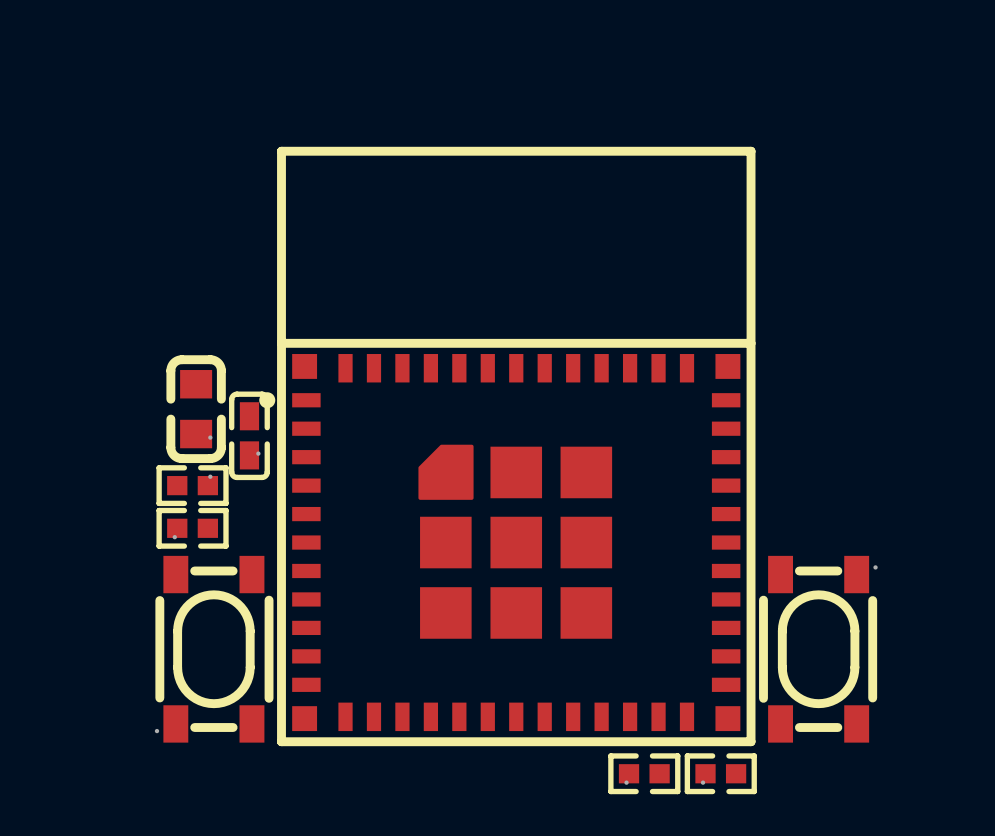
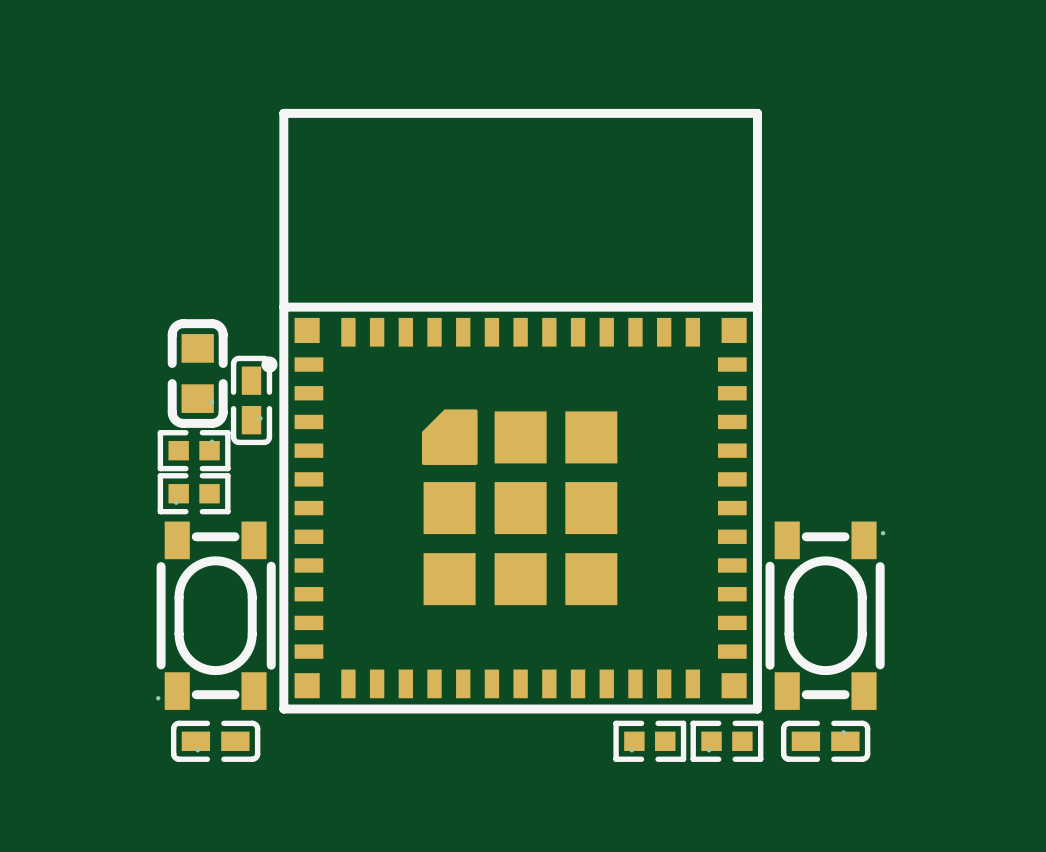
part: none -> (215, 741)
part: none -> (825, 741)

